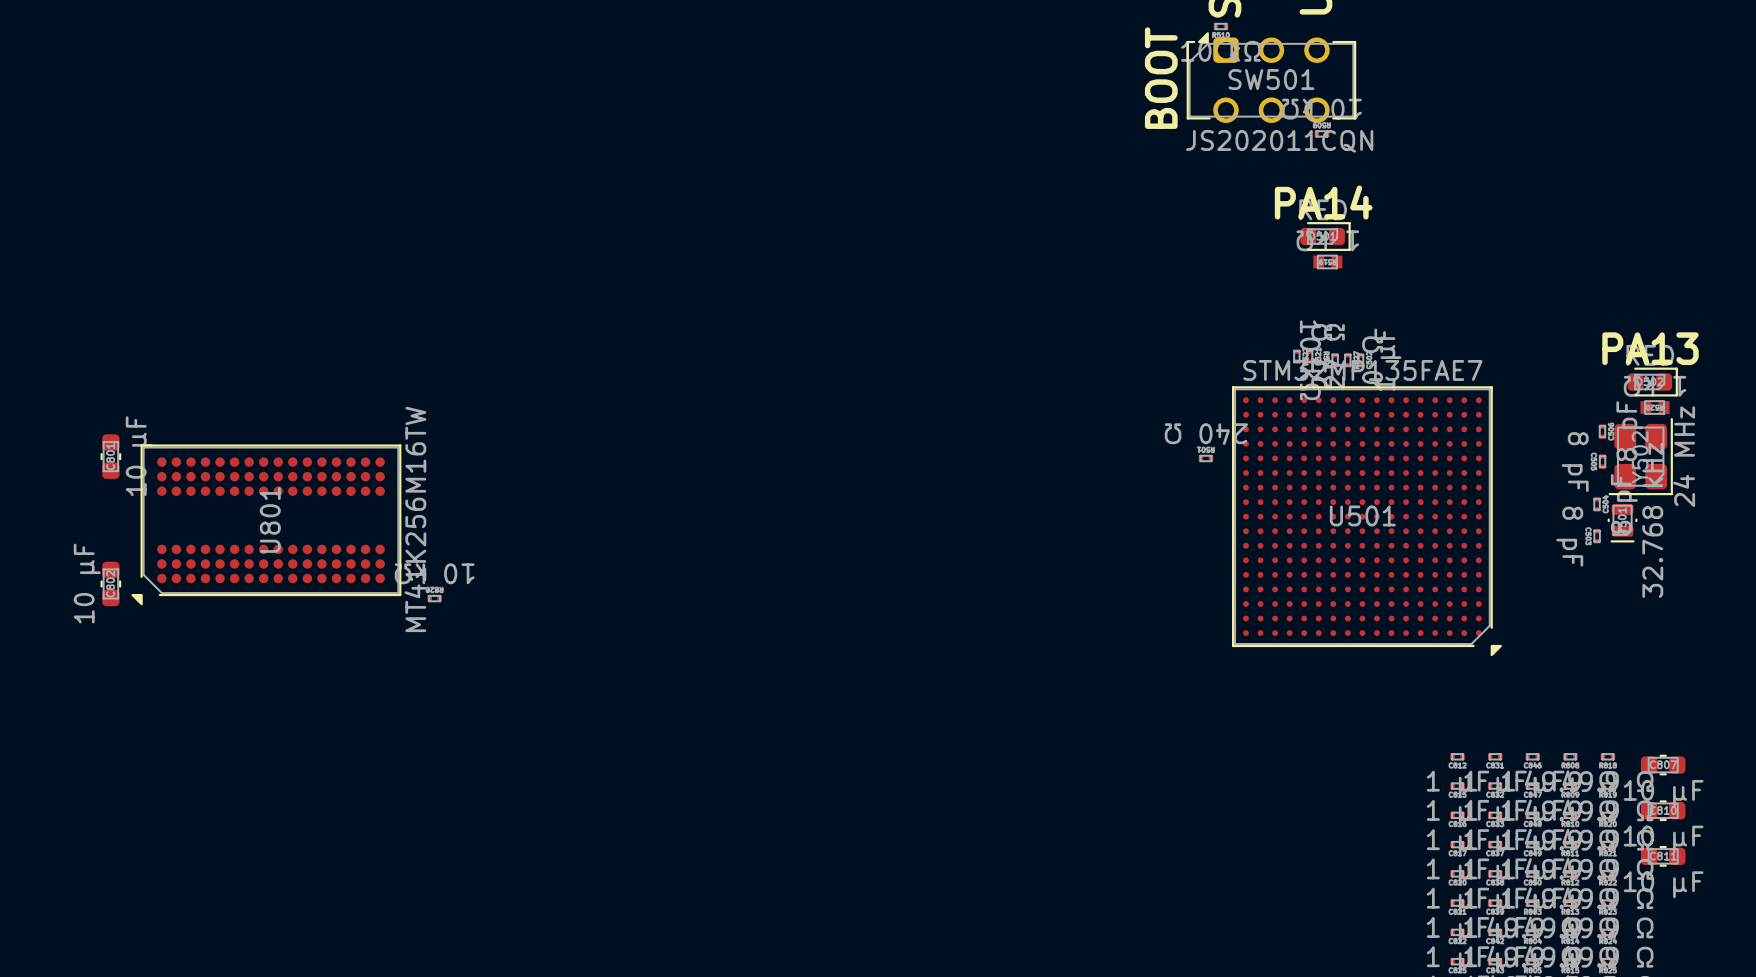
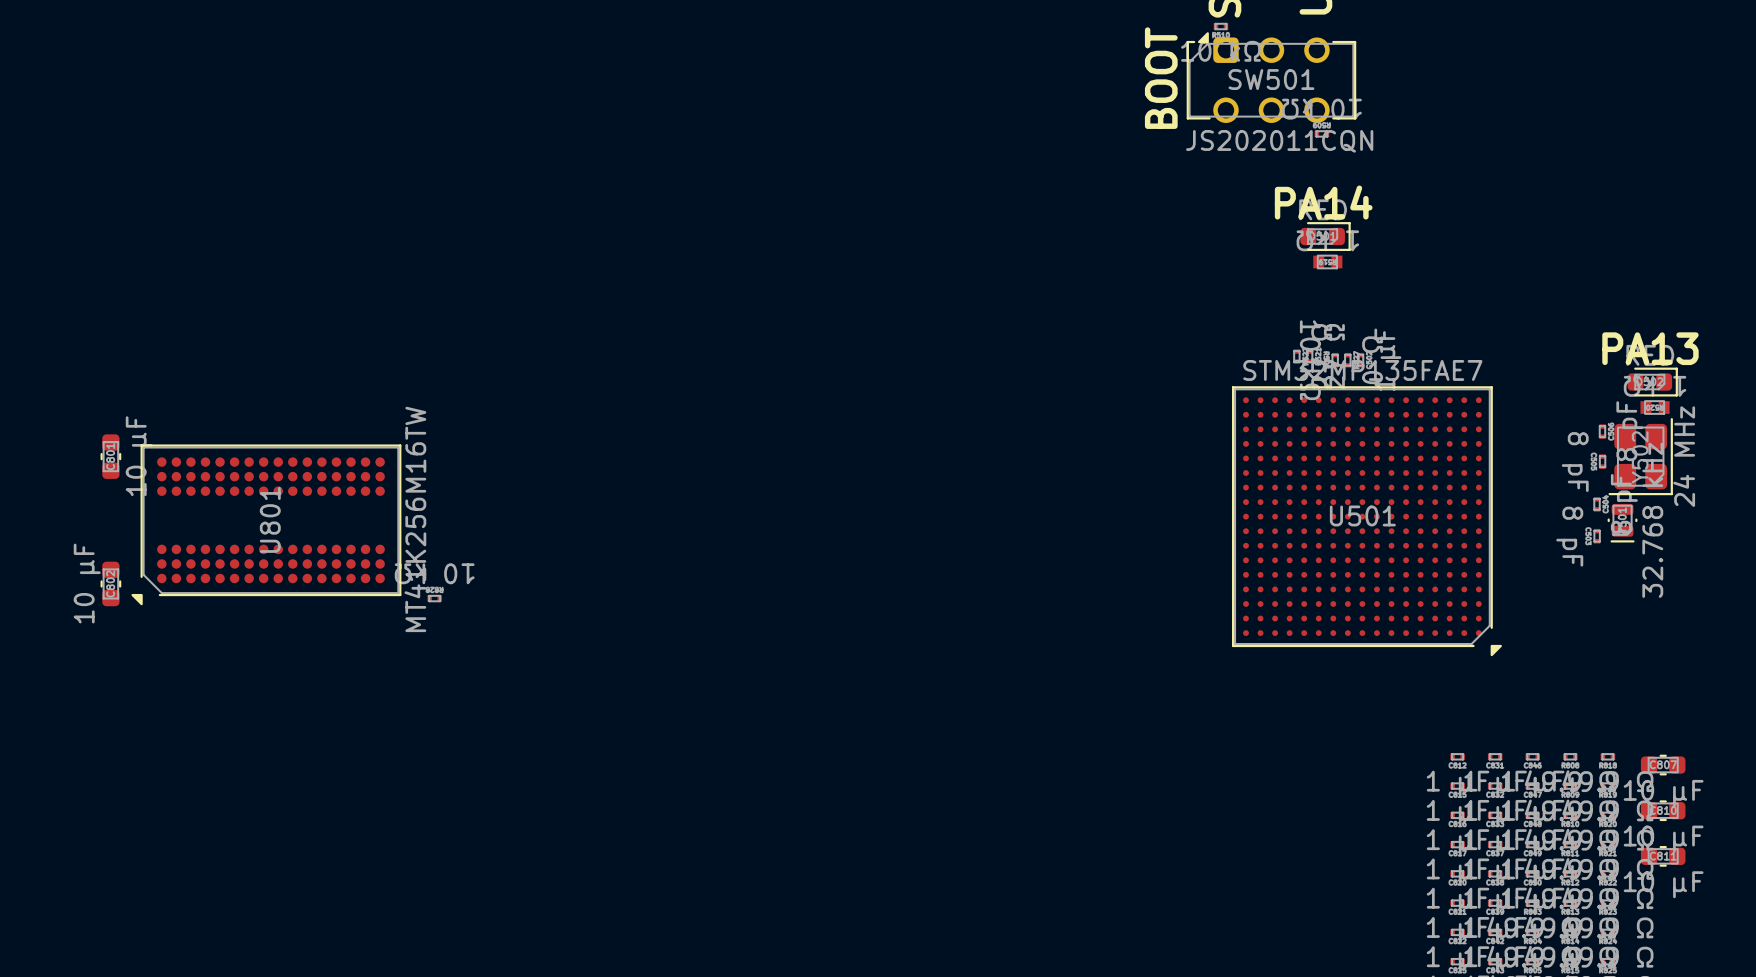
part: 240 Ω (1205, 458) -> none

